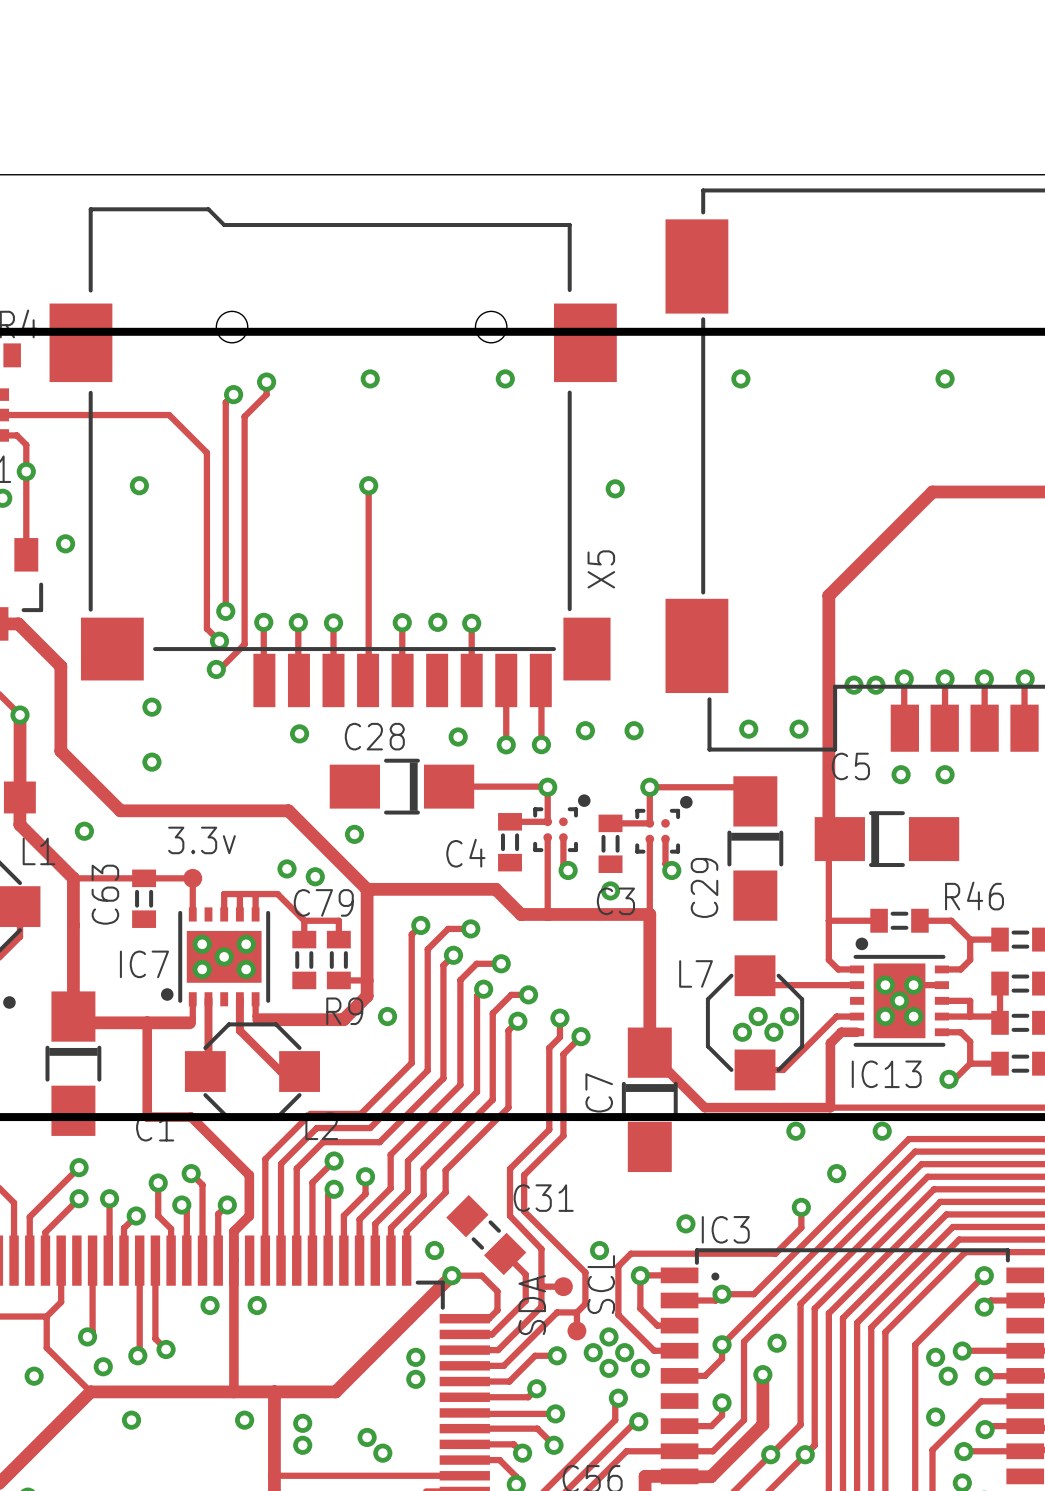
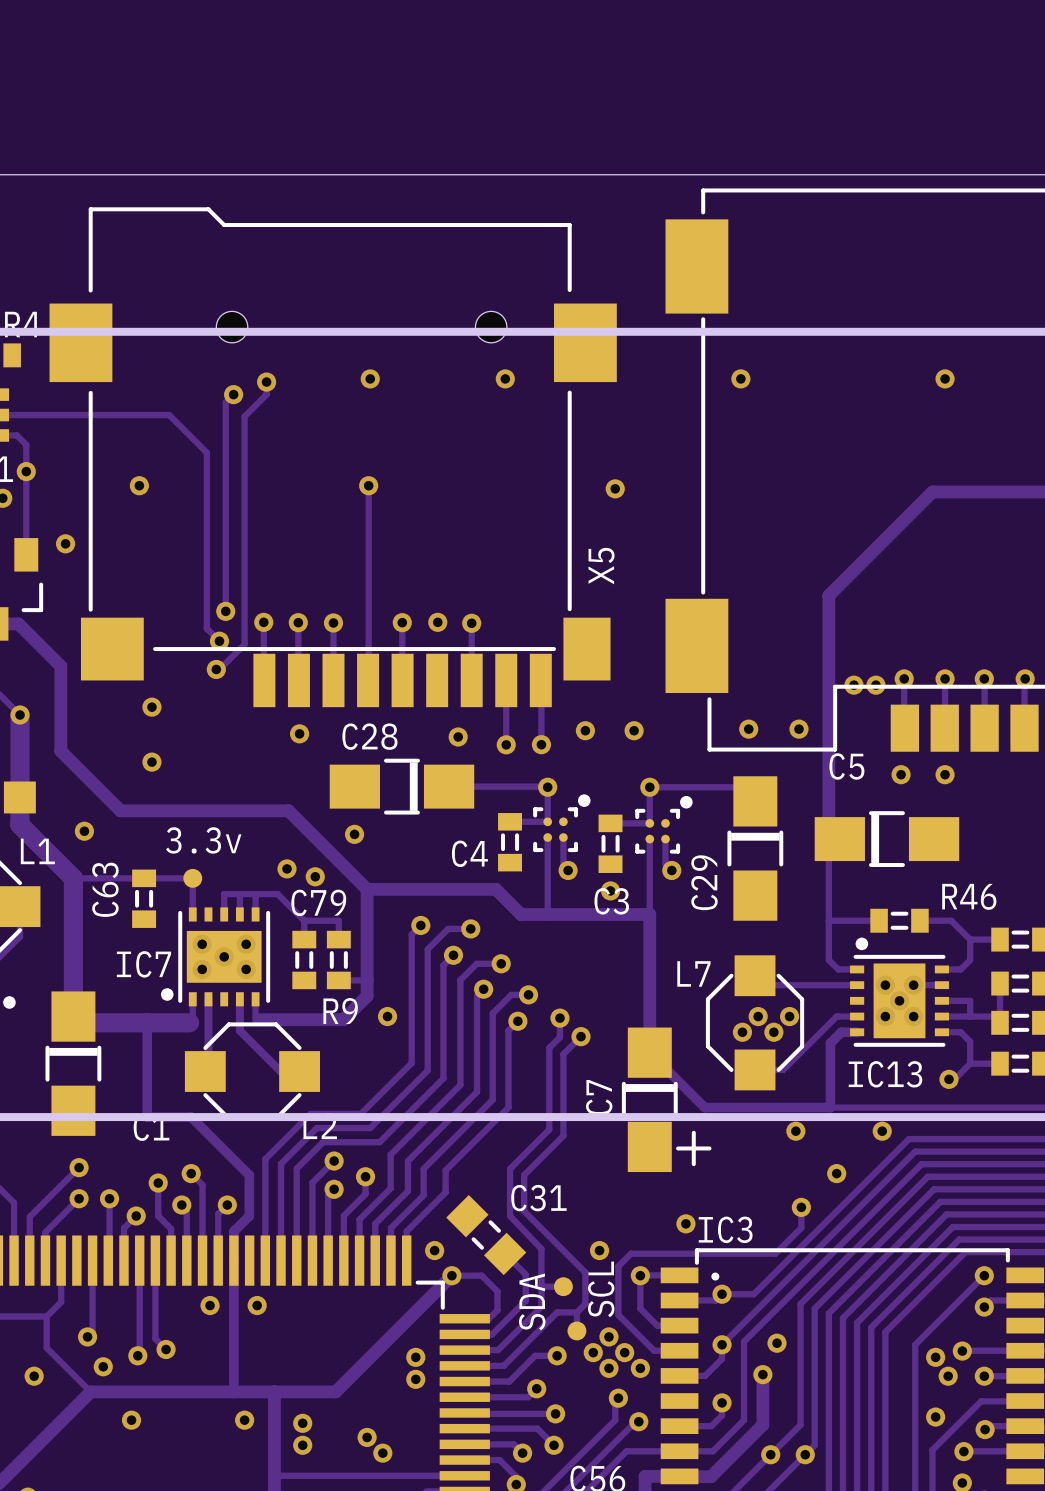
track width: thin (20, 715) (19, 824) (73, 878) (73, 1016) -> thick (20, 715) (19, 824) (73, 878) (73, 1016)
track width: thin (74, 1022) (189, 1022) -> thick (74, 1022) (189, 1022)
drawing: none -> [676, 1130, 712, 1167]

